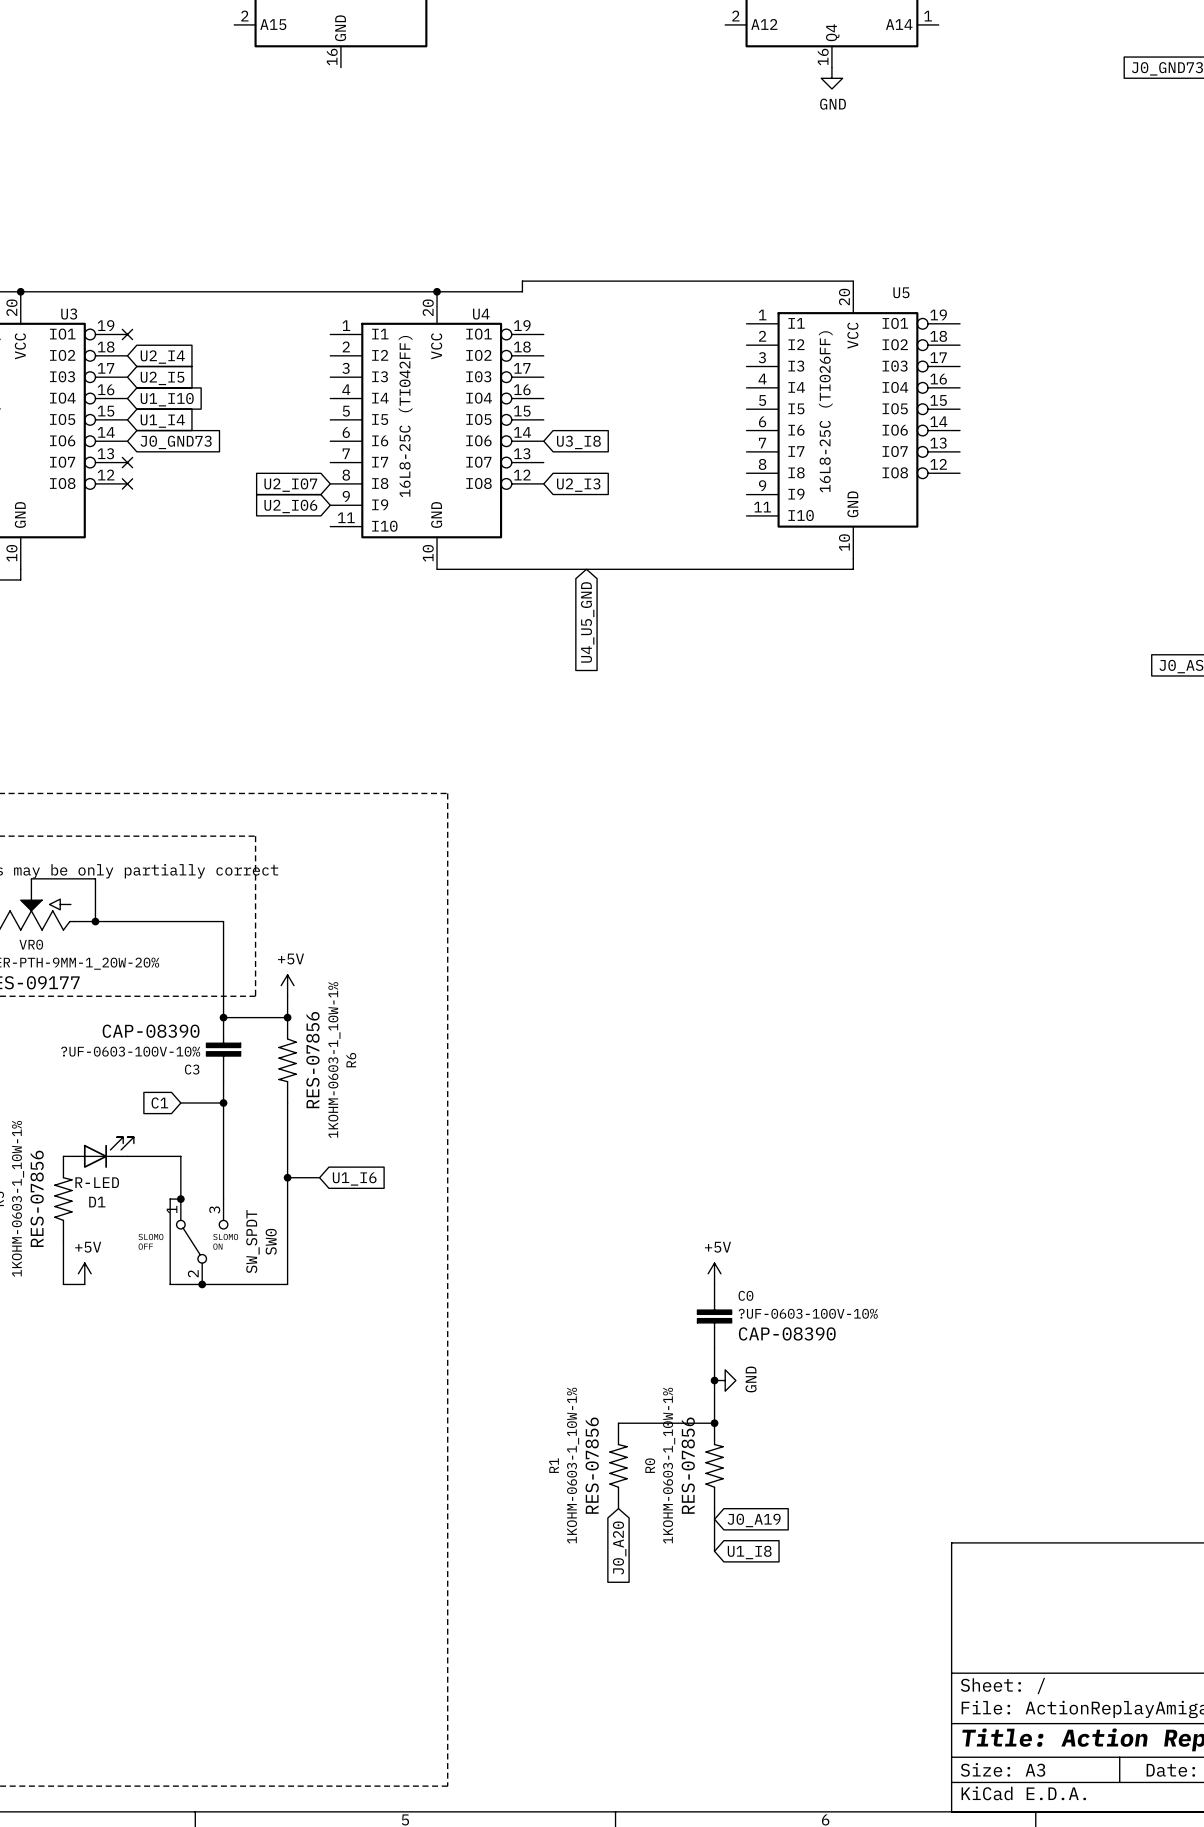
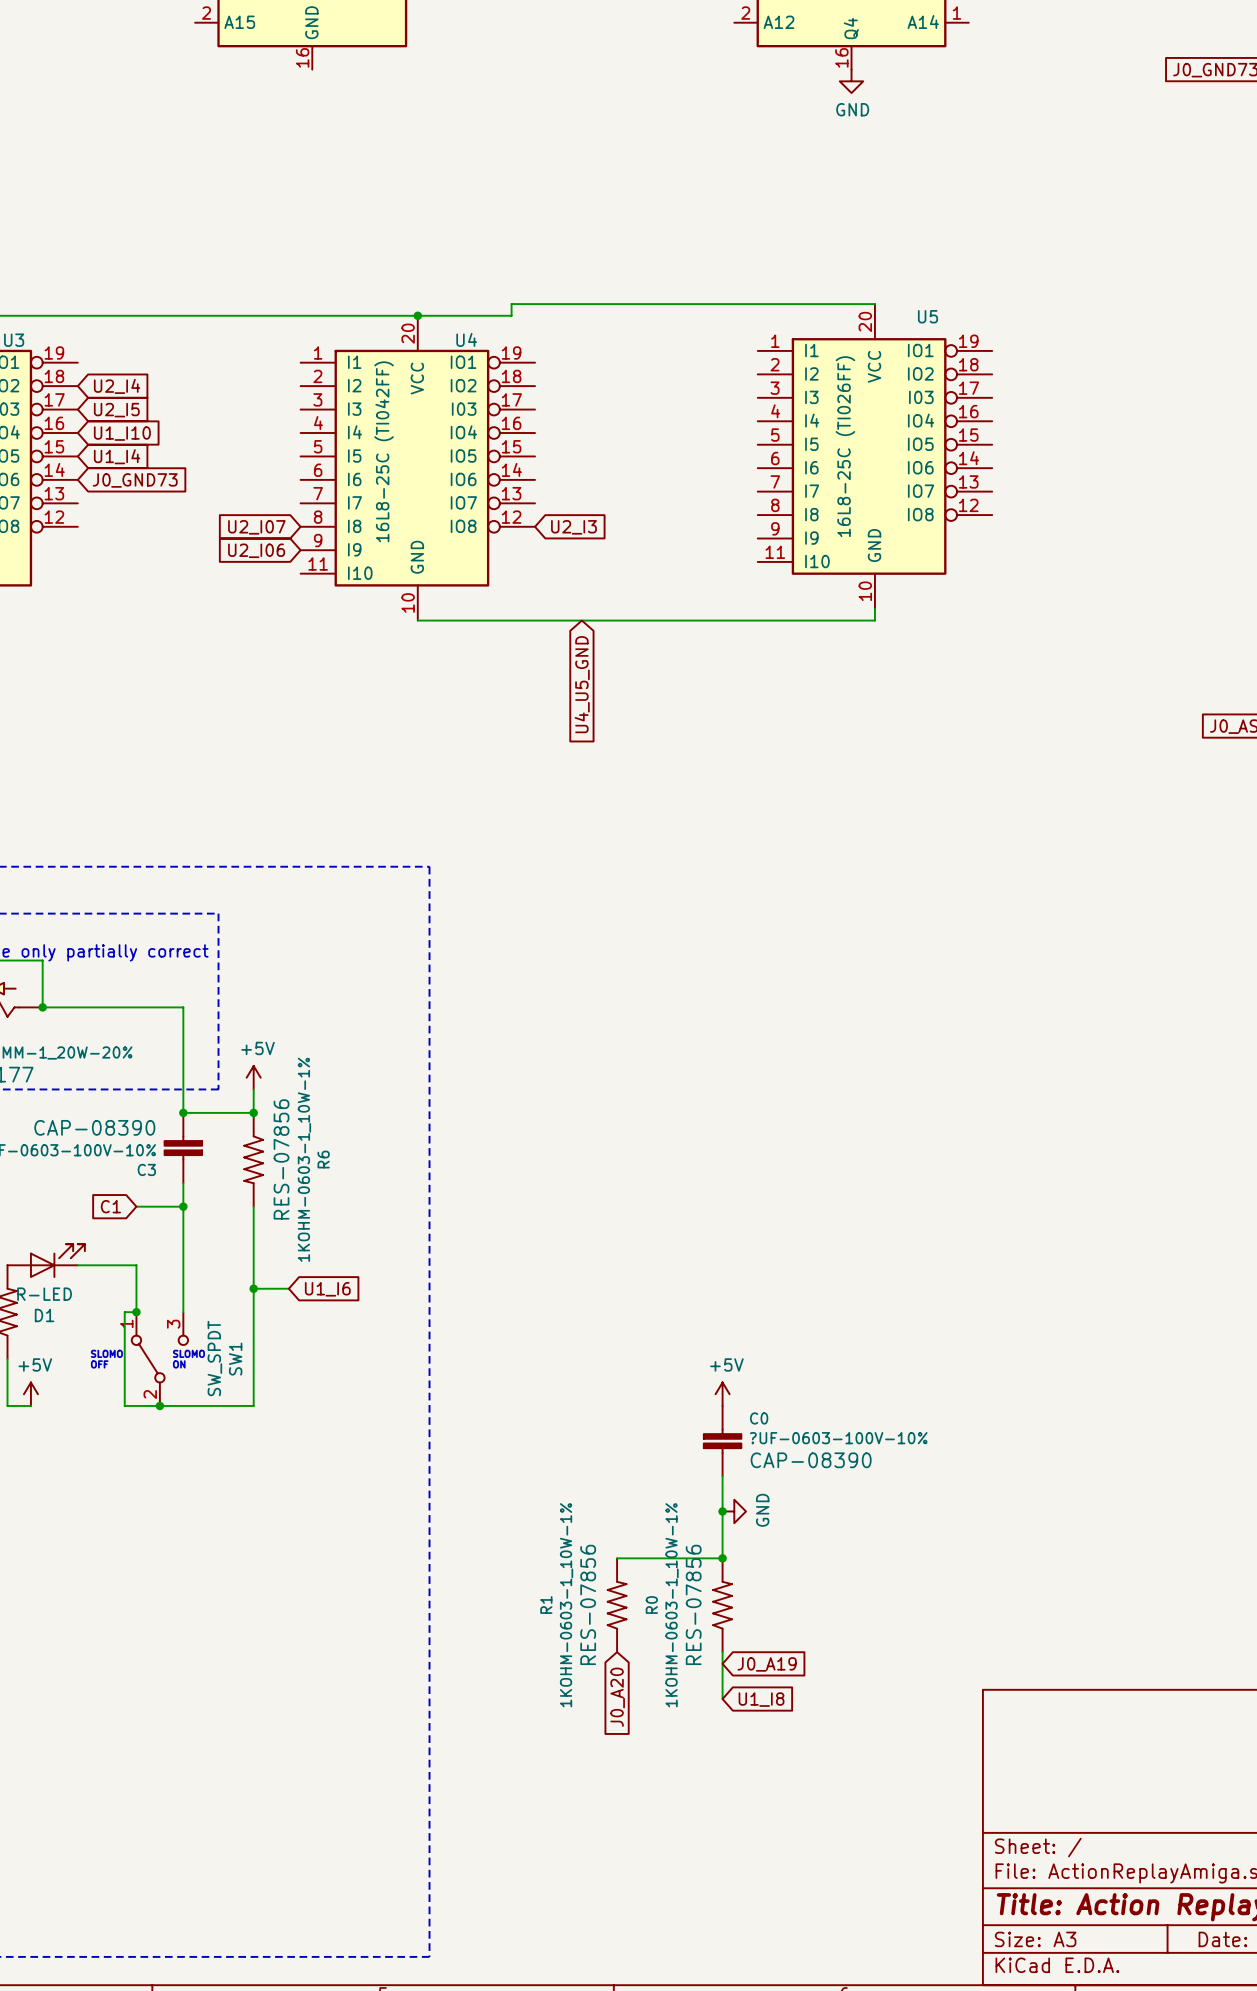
no-connect mark: (127, 334) -> none
global label: U3_I8 (578, 442) -> none
no-connect mark: (127, 462) -> none
no-connect mark: (127, 483) -> none
SW0 name: SW0 (271, 1241) -> SW1 (235, 1359)

